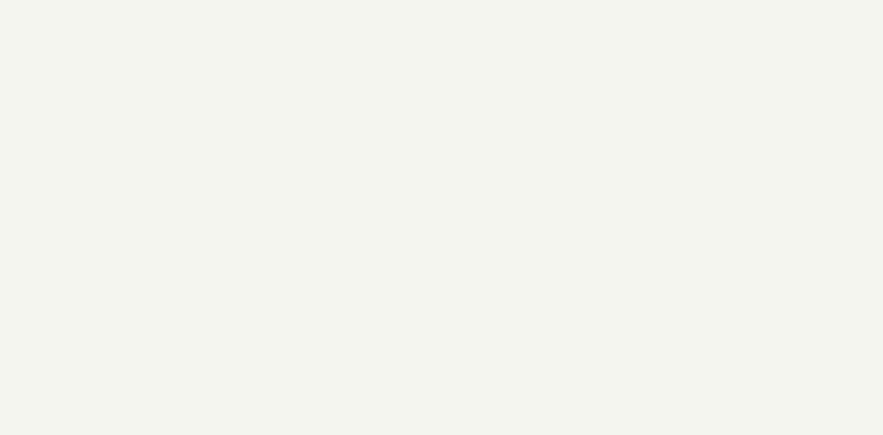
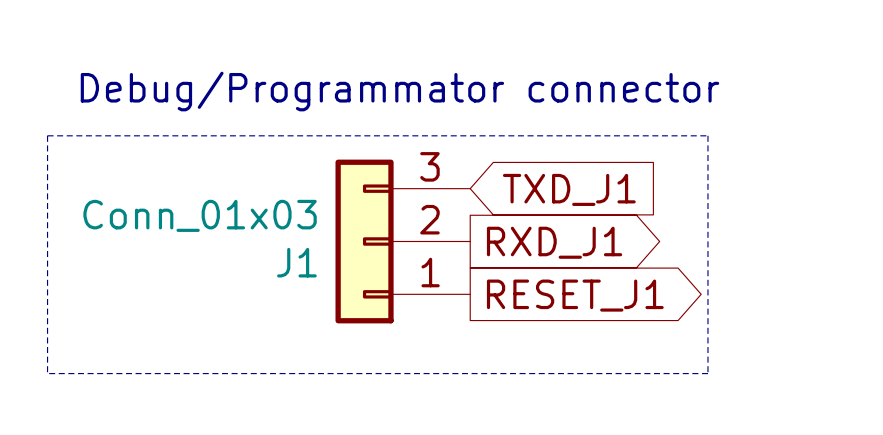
text: none -> Debug/Programmator connector (399, 91)
line: none -> (47, 135) (707, 135) (707, 373) (47, 373) (47, 135)
global label: none -> TXD_J1 (569, 189)
J1: none -> Conn_01x03 (402, 241)
global label: none -> RXD_J1 (554, 242)
global label: none -> RESET_J1 (575, 295)

